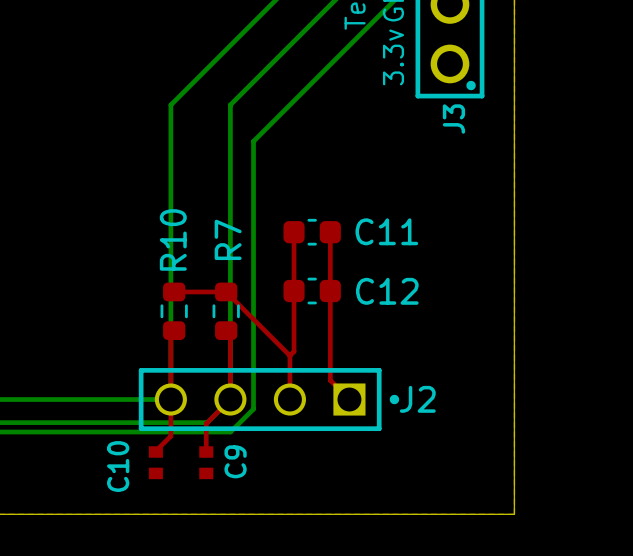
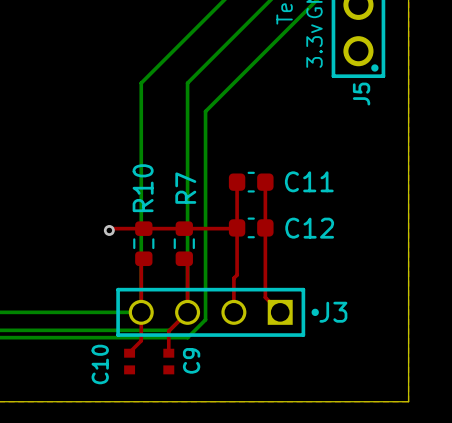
J3 name: J3 (453, 119) -> J5 (361, 94)
top track: none -> (143, 228) (111, 228) (109, 230)
top track: (226, 291) (289, 355) -> (184, 228) (237, 227)
via: none -> (109, 230)
J2 name: J2 (417, 399) -> J3 (333, 312)

